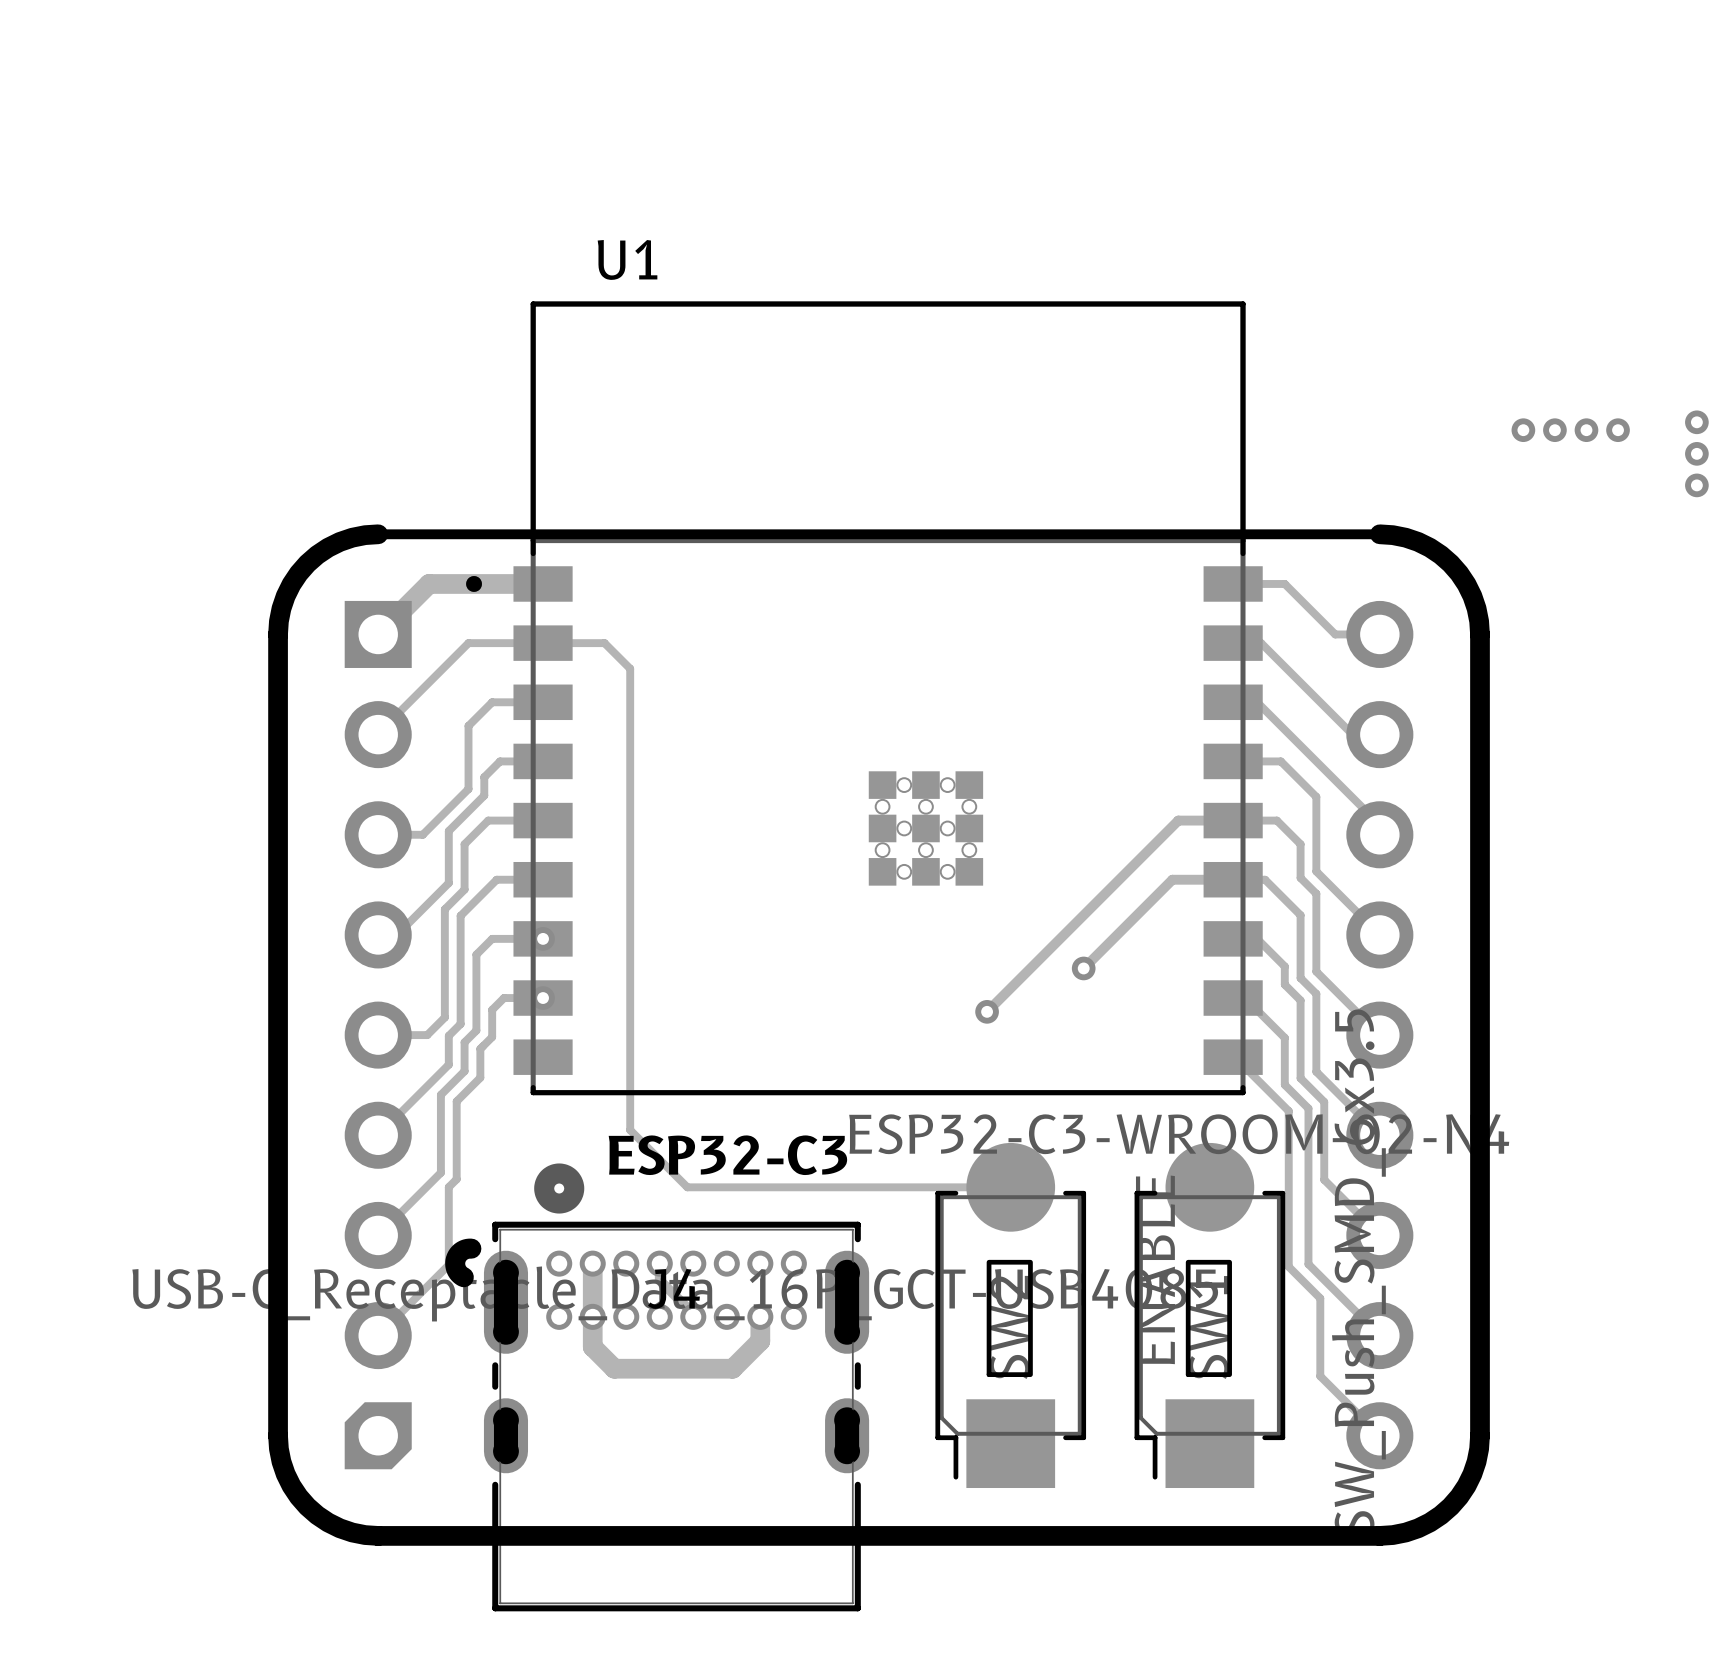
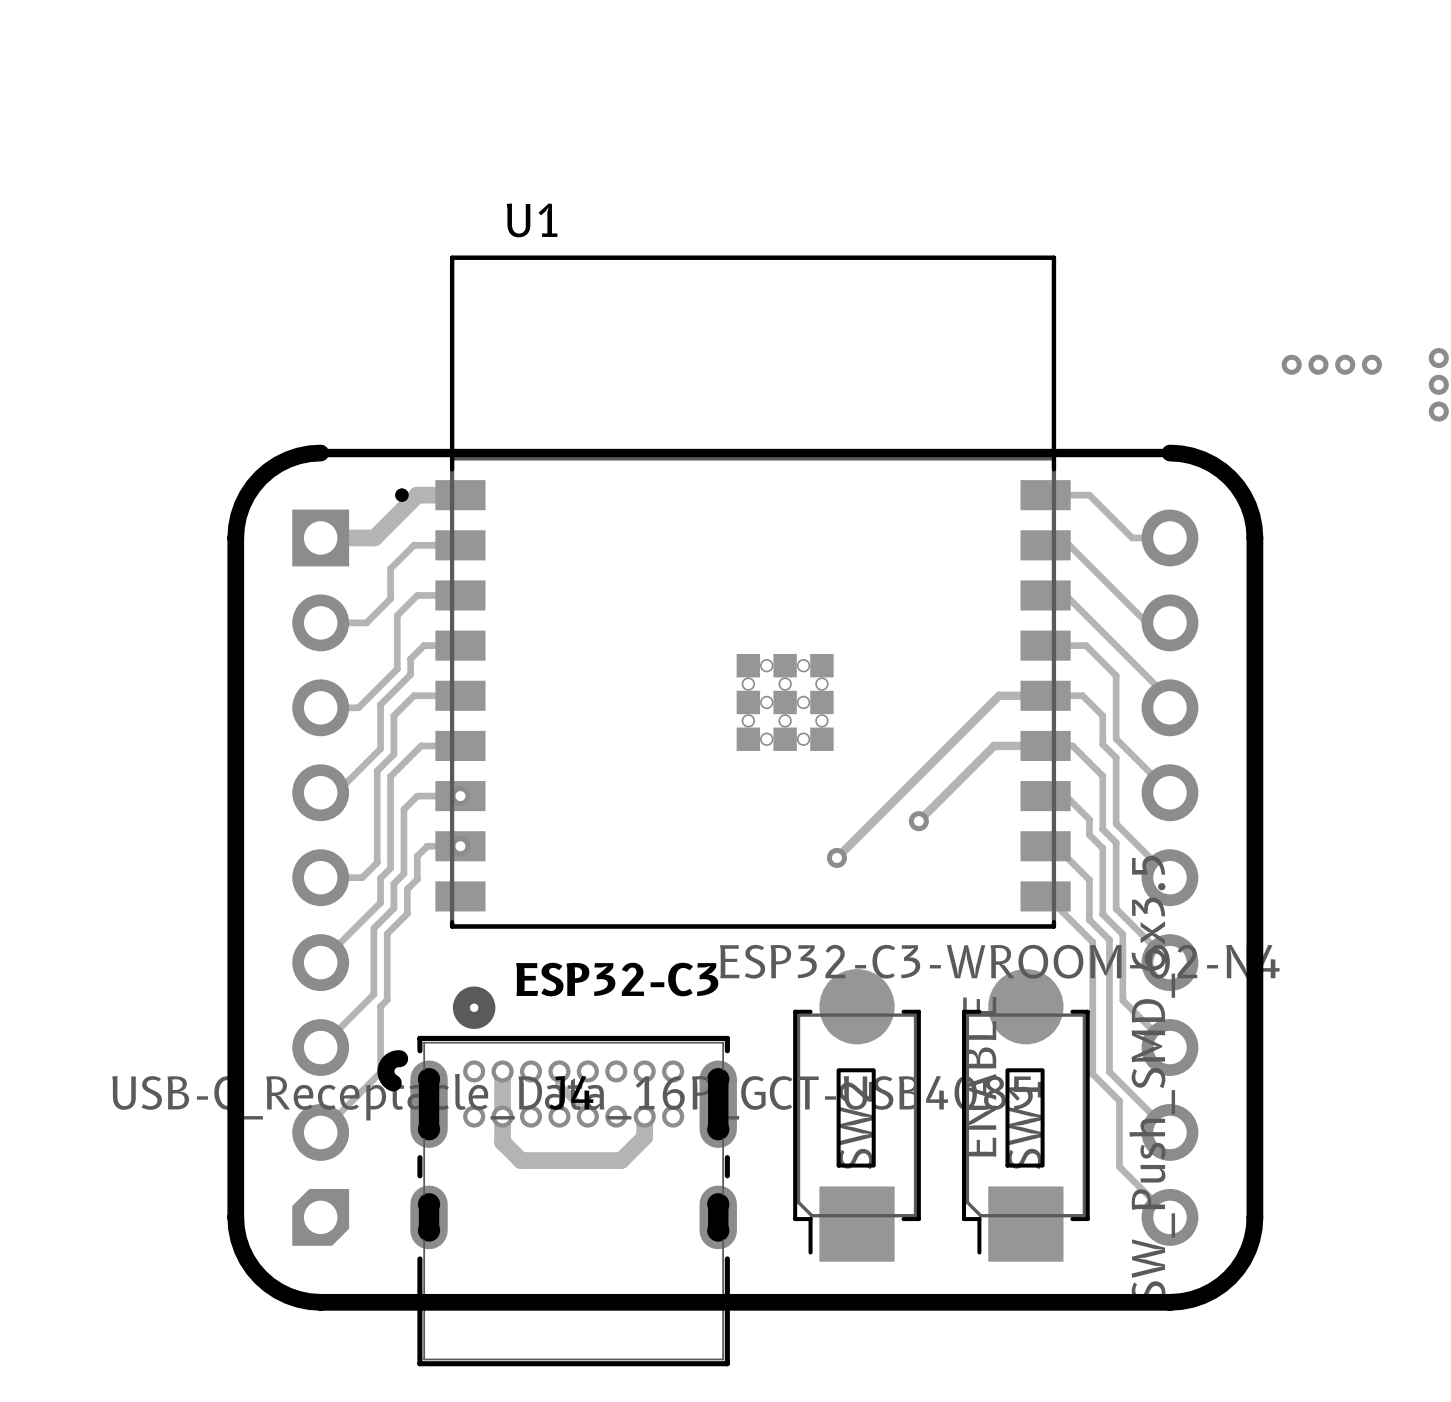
track: (492, 583) (429, 583) (378, 634) -> (417, 495) (374, 537) (321, 537)
track: (488, 643) (468, 643) (378, 734) -> (413, 545) (390, 568) (390, 598) (366, 622) (320, 622)
track: (543, 643) (604, 643) (630, 668) (630, 1130) (687, 1187) (1010, 1187) -> none

